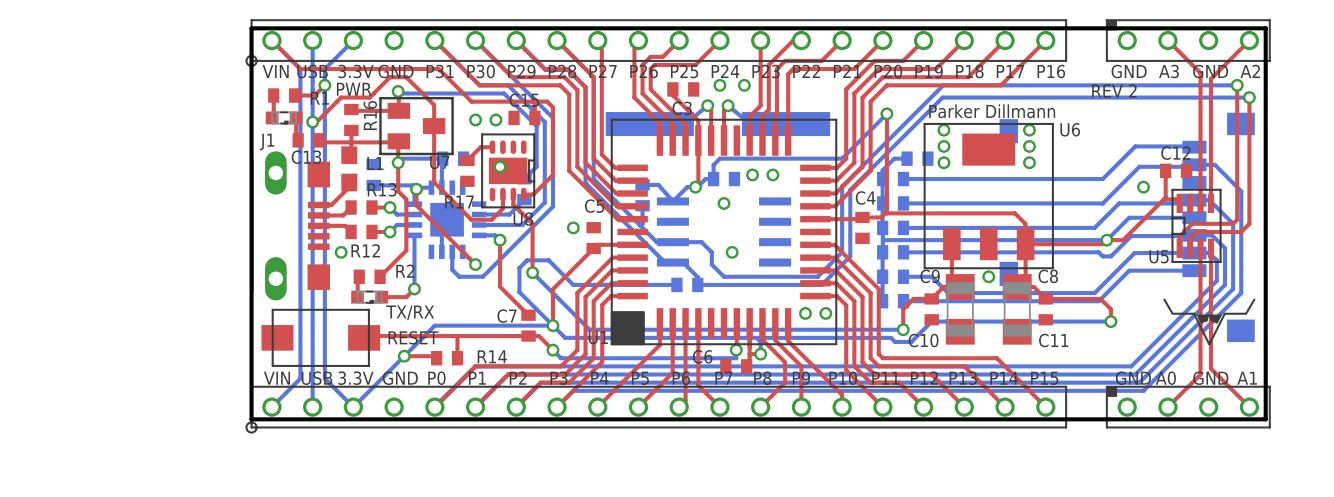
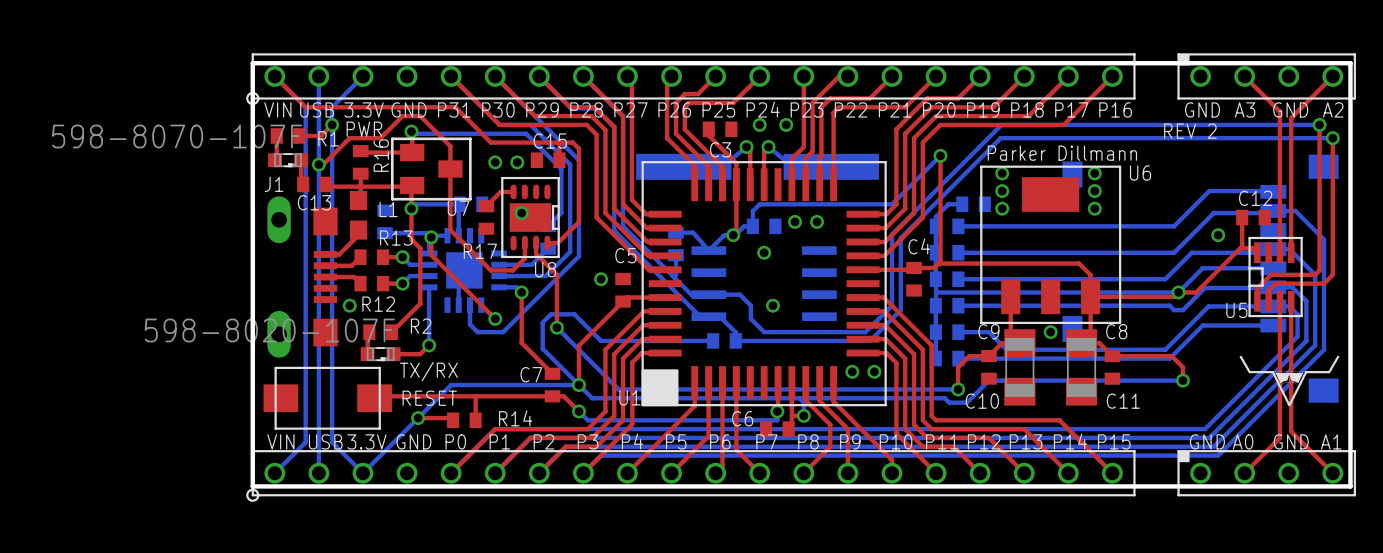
PWR value: none -> 598-8070-107F (177, 136)
TX/RX value: none -> 598-8020-107F (269, 330)

